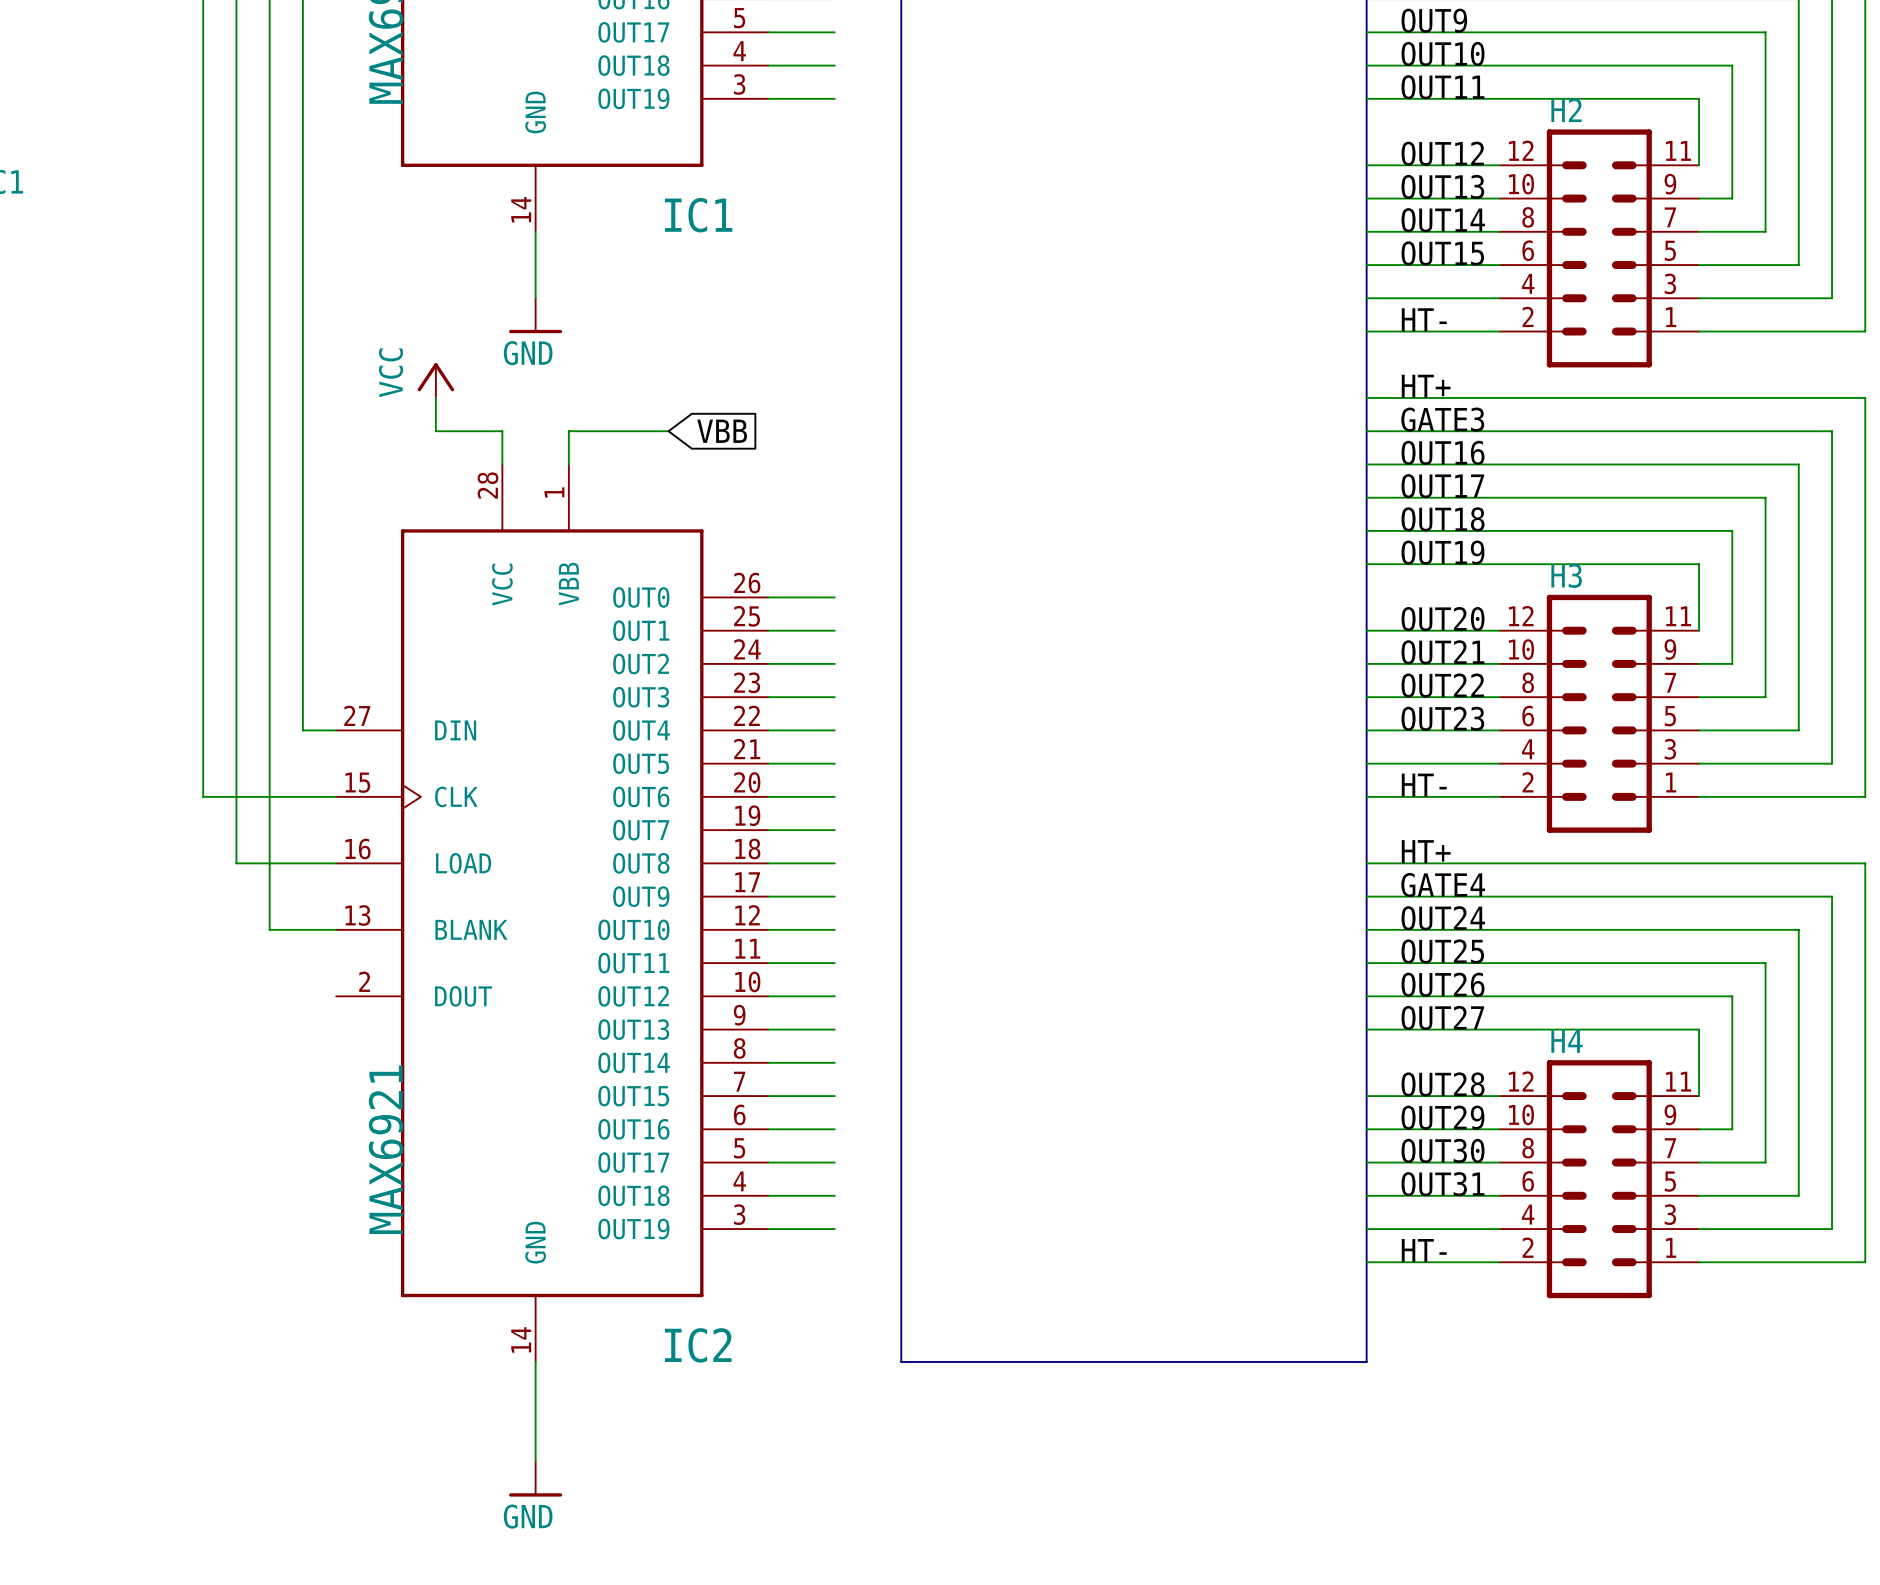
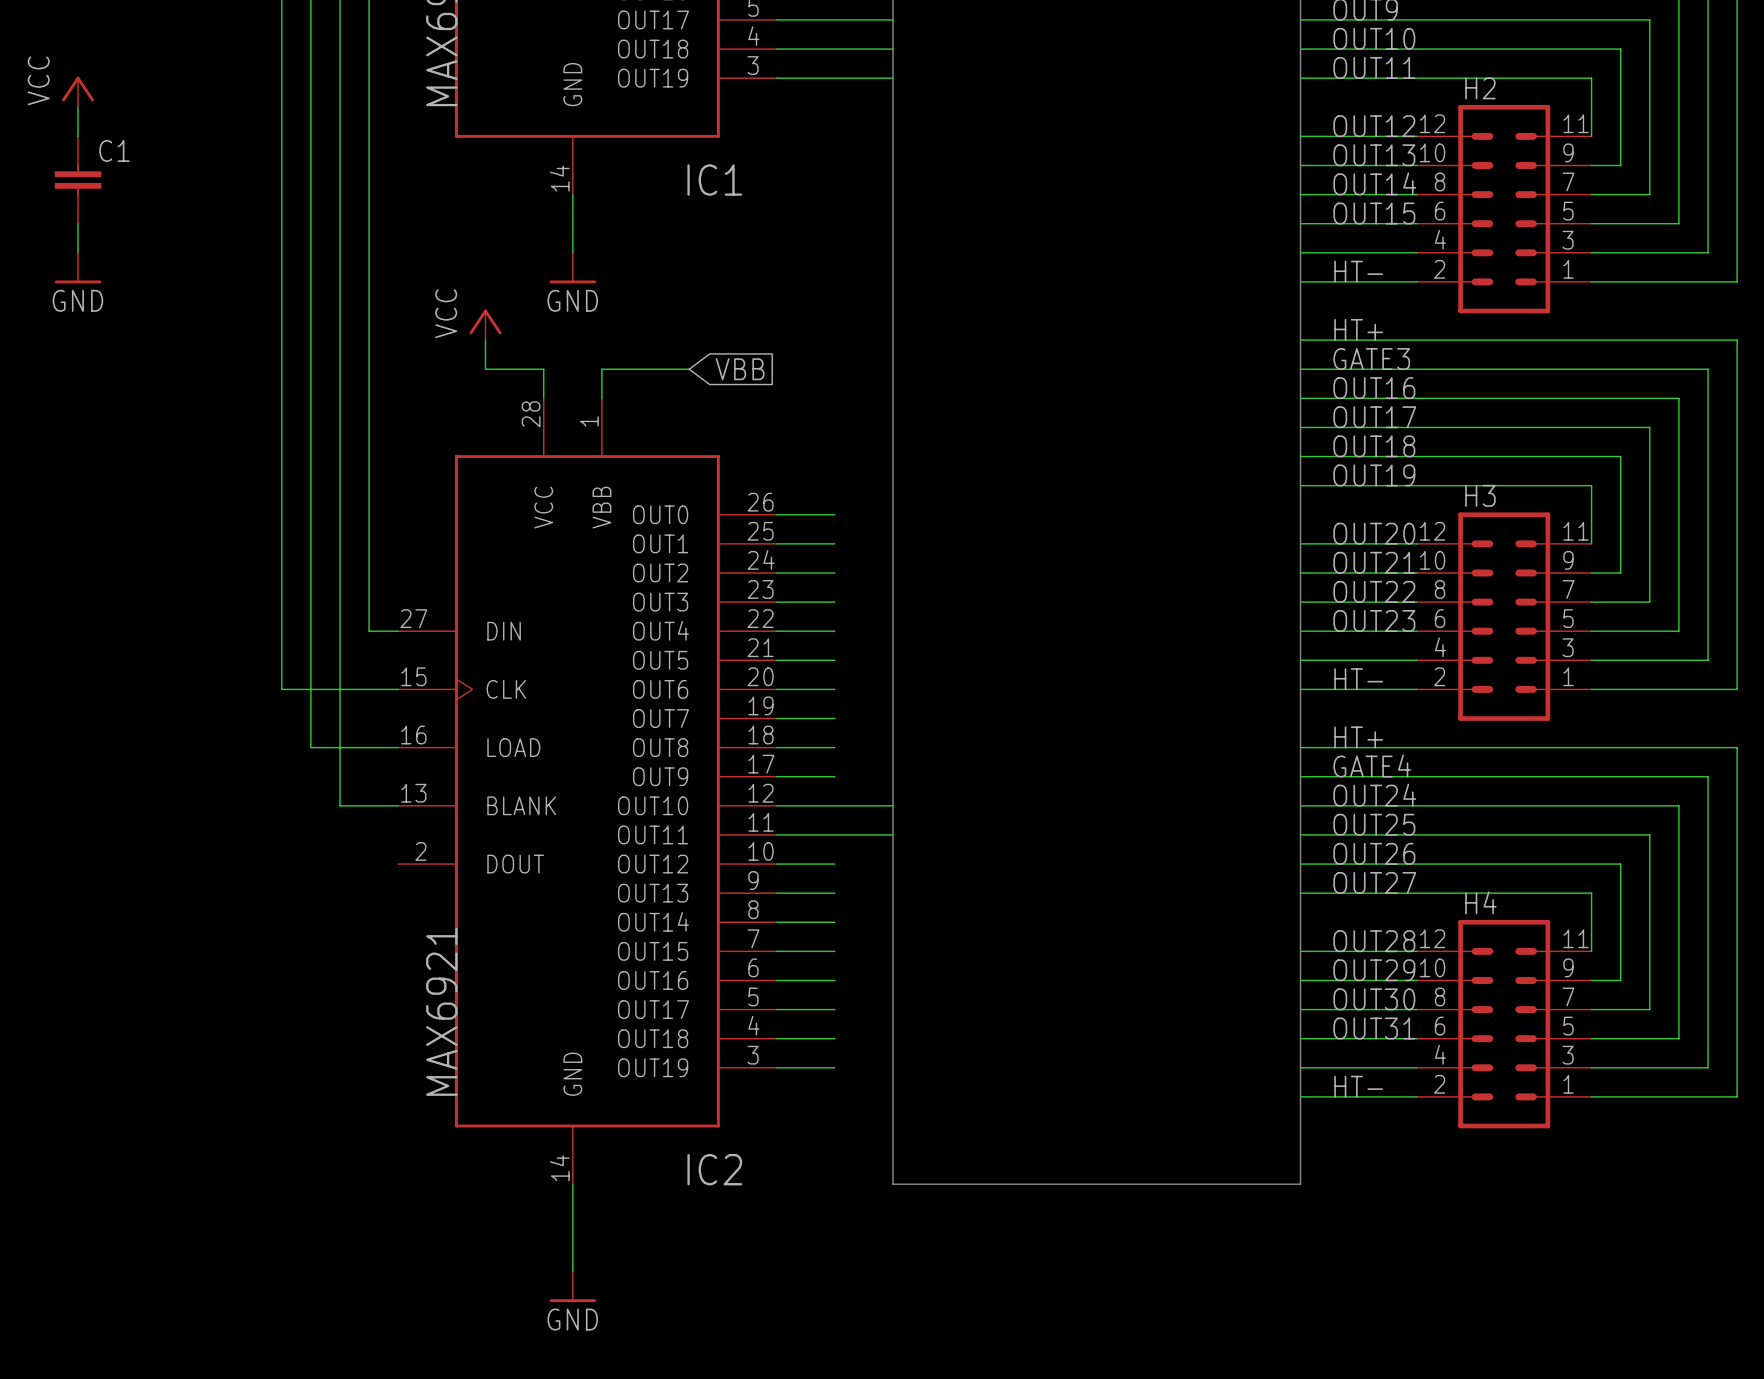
wire: none -> (834, 19) (893, 19)
wire: none -> (834, 49) (893, 49)
wire: none -> (834, 78) (893, 78)
wire: none -> (834, 805) (893, 805)
wire: none -> (834, 834) (893, 834)

